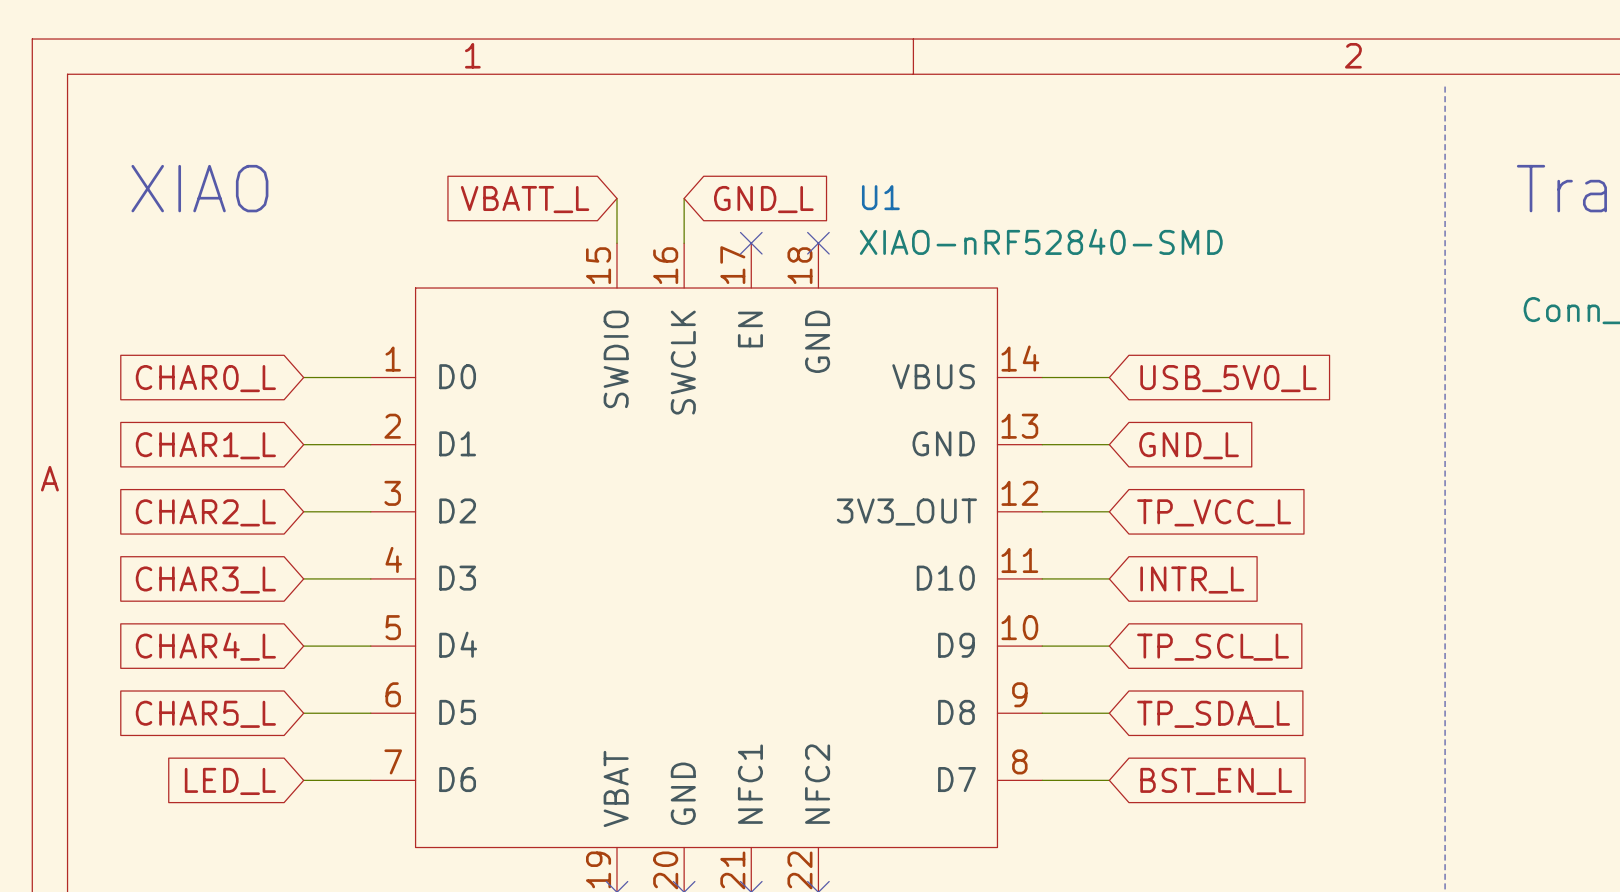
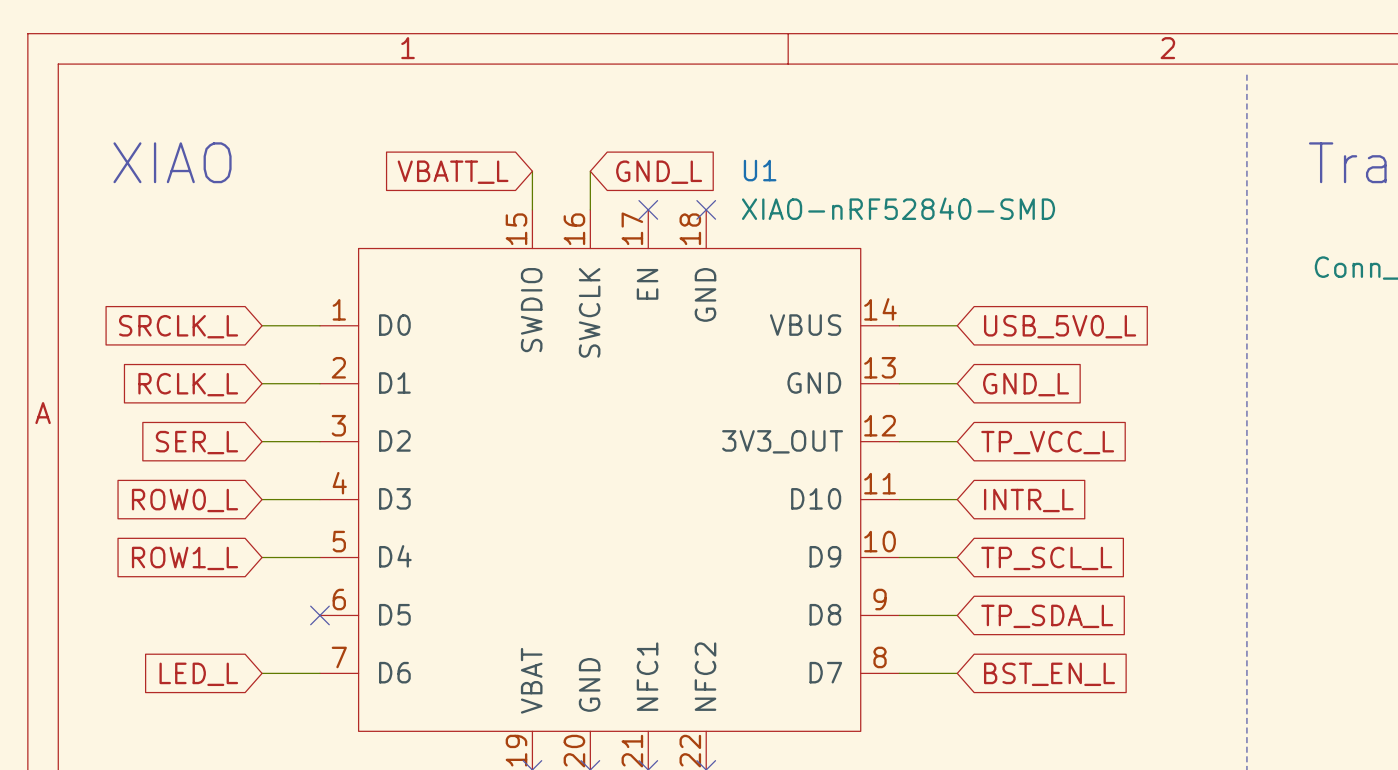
global label: CHAR0_L (205, 378) -> SRCLK_L (178, 326)
global label: CHAR1_L (205, 445) -> RCLK_L (188, 384)
global label: CHAR2_L (205, 512) -> SER_L (196, 442)
global label: CHAR3_L (205, 580) -> ROW0_L (184, 500)
global label: CHAR4_L (205, 646) -> ROW1_L (184, 558)
wire: (303, 713) (370, 713) -> none
no-connect mark: none -> (319, 615)
global label: CHAR5_L (205, 714) -> none

